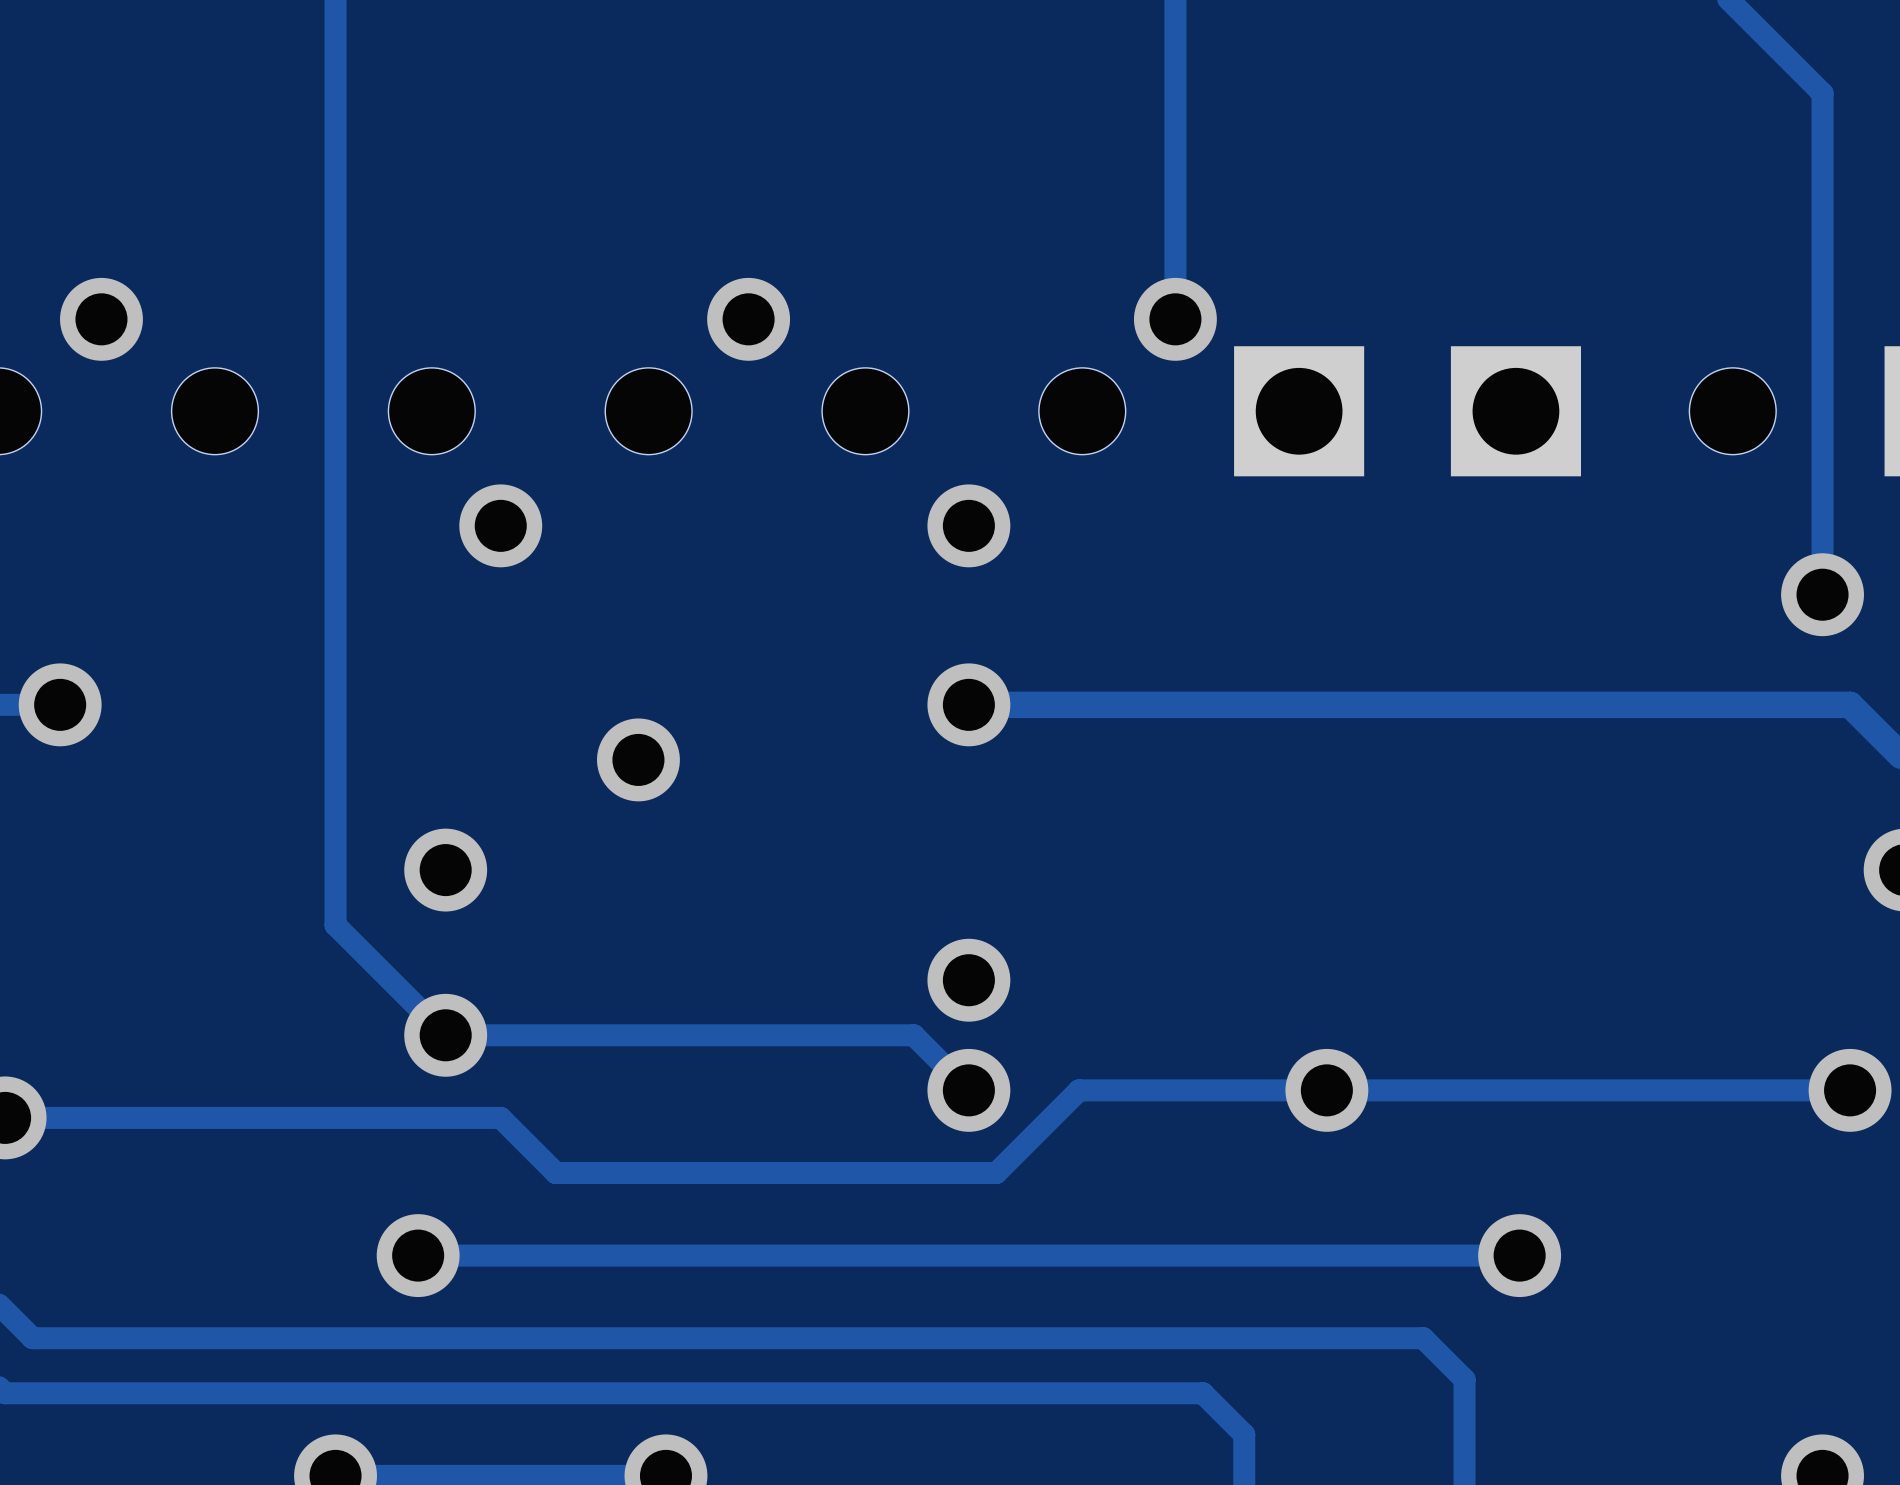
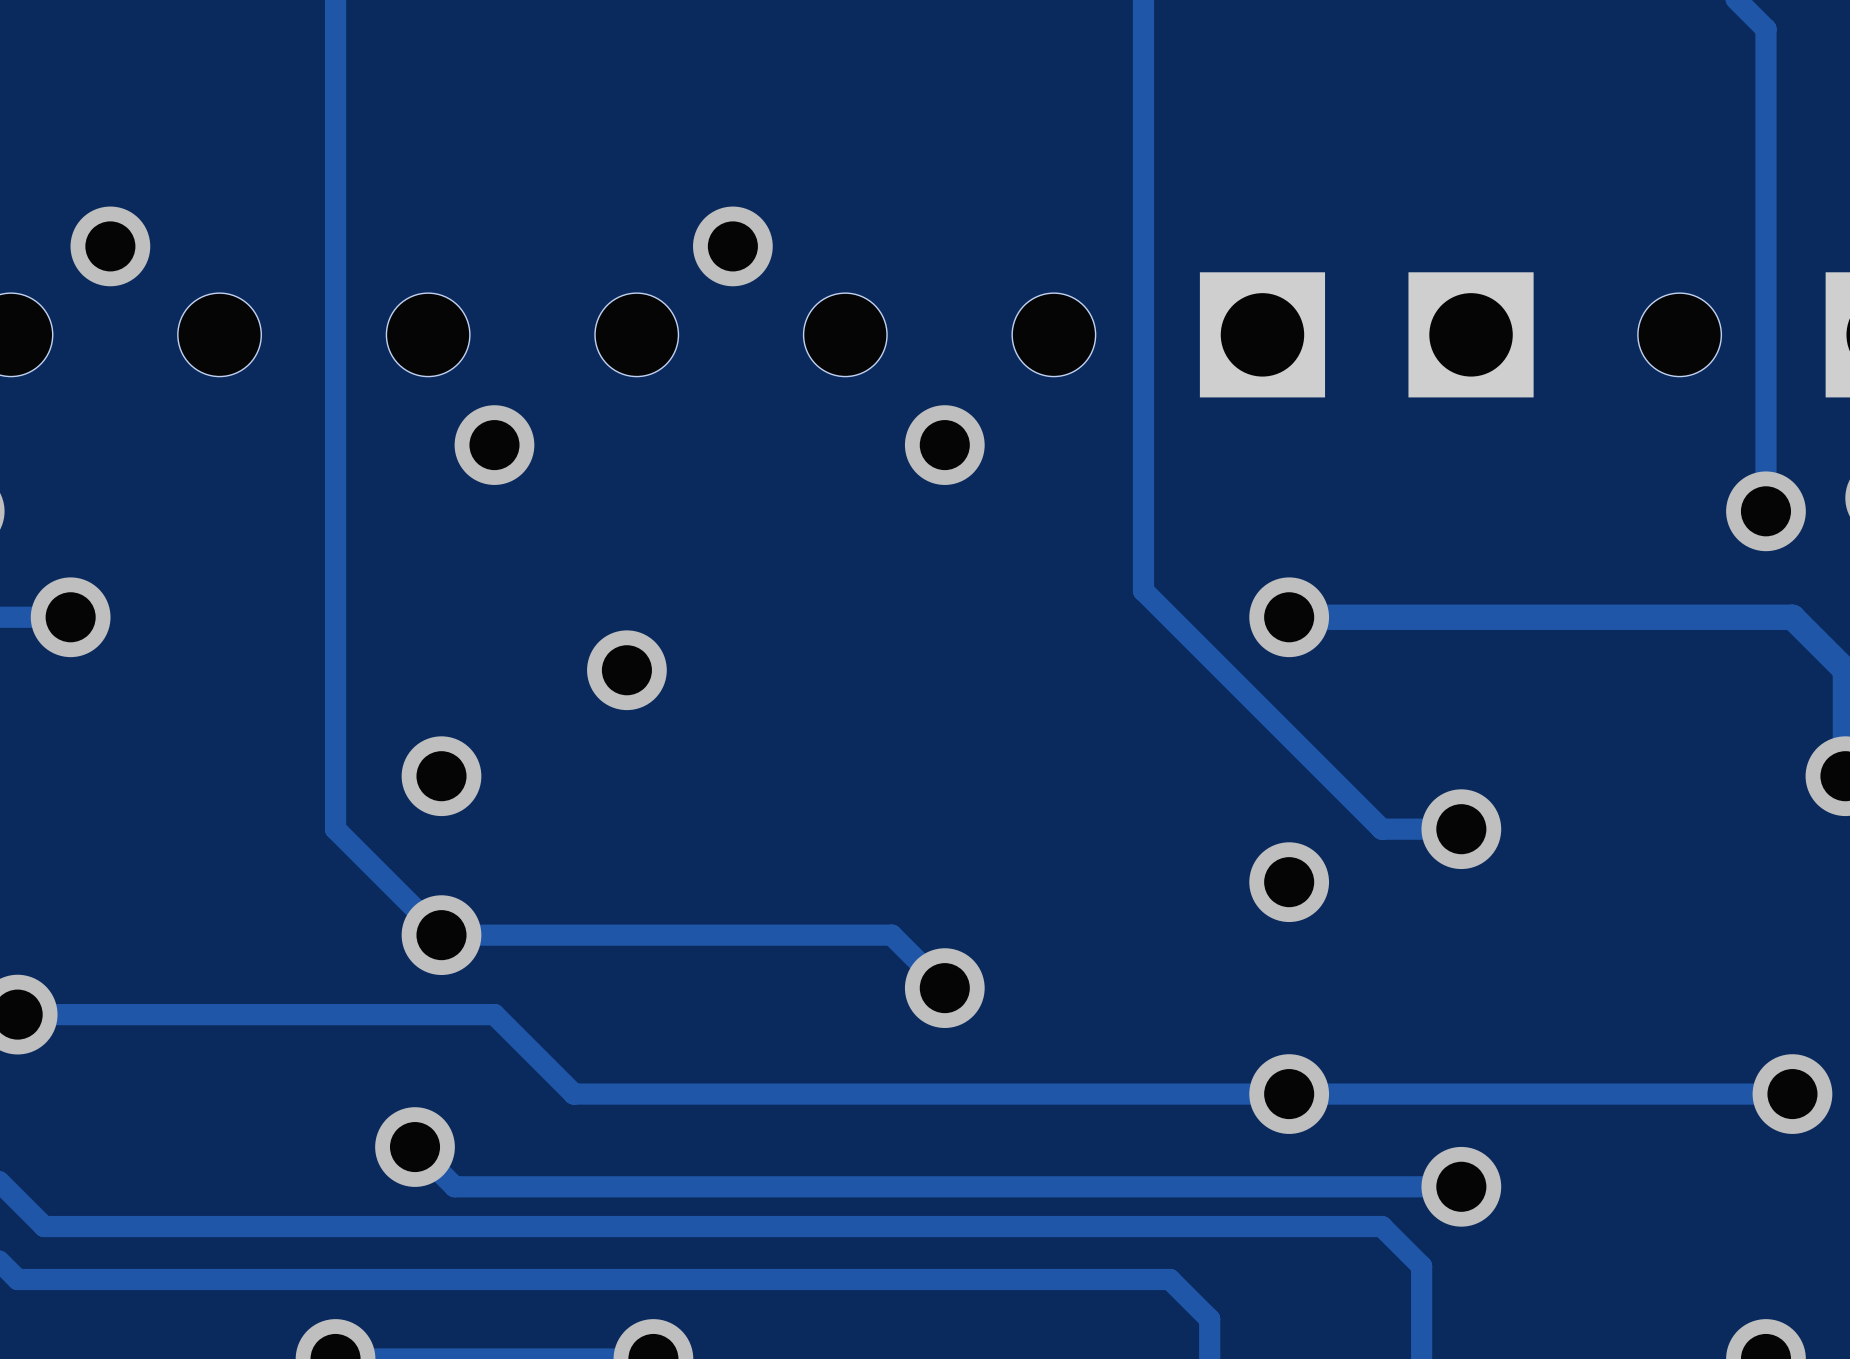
track: none -> (1143, 246) (1143, 590) (1381, 829) (1461, 829)
via: (1175, 319) -> none
via: (968, 704) -> none
track: (1326, 704) (968, 704) -> none
via: none -> (1289, 617)
via: none -> (1461, 829)
via: (968, 980) -> none
via: none -> (1289, 882)
via: (1326, 1090) -> none
track: (1850, 1090) (1079, 1090) (996, 1172) (555, 1172) -> (1792, 1094) (573, 1094) (547, 1067)
via position: (1850, 1090) -> (1792, 1094)
via: none -> (1289, 1094)
track: (1519, 1255) (418, 1255) -> (1461, 1186) (454, 1186) (415, 1147)
via position: (1519, 1255) -> (1461, 1186)

